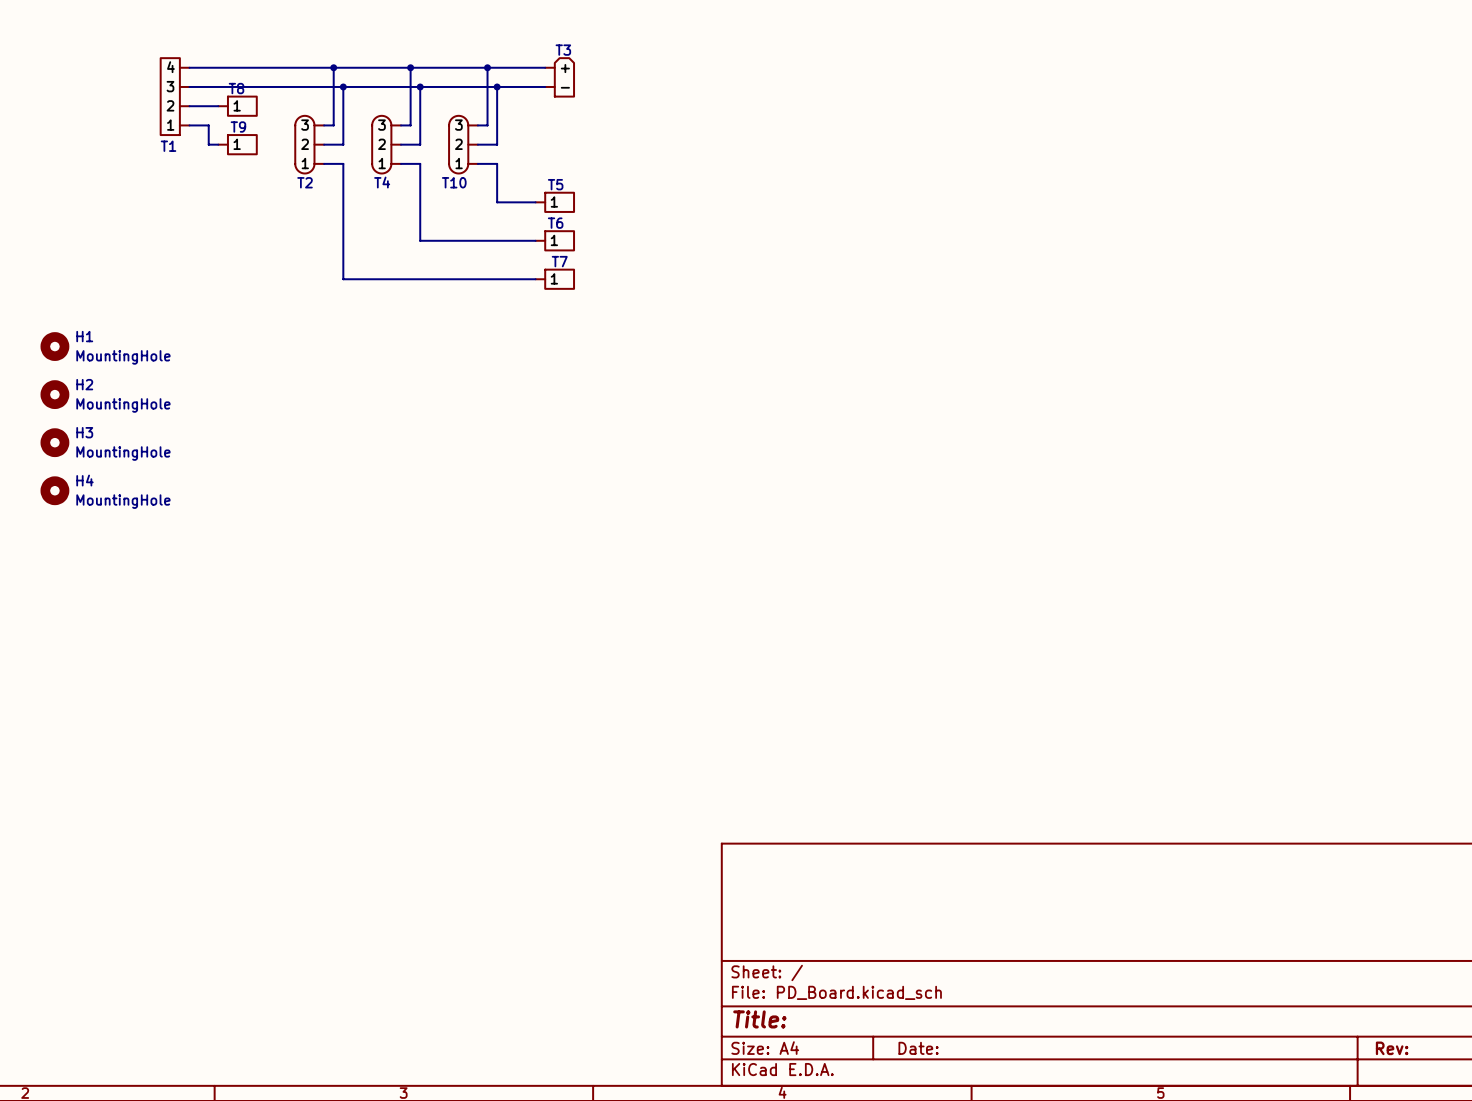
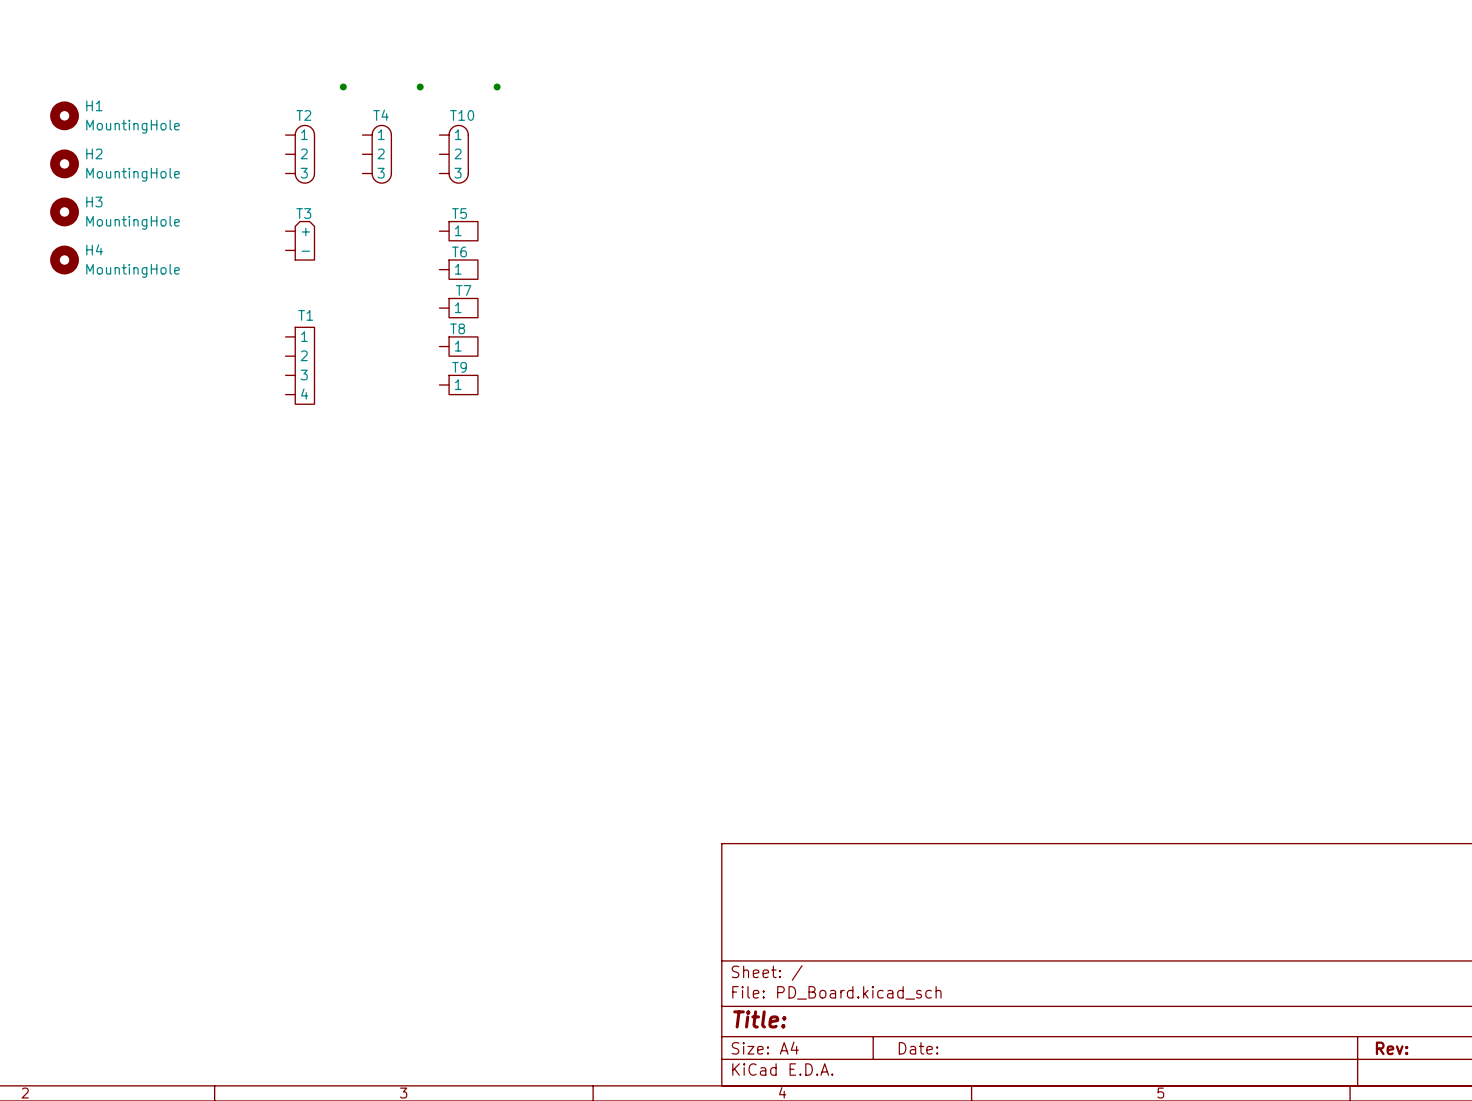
wire: (189, 67) (545, 67) -> none
wire: (333, 67) (333, 125) (324, 125) -> none
junction: (333, 67) -> none
wire: (410, 67) (410, 125) (401, 125) -> none
junction: (410, 67) -> none
wire: (487, 67) (487, 125) (477, 125) -> none
junction: (487, 67) -> none
T3 position: (559, 77) -> (300, 240)
wire: (189, 86) (545, 86) -> none
wire: (343, 86) (343, 144) (324, 144) -> none
wire: (420, 86) (420, 144) (401, 144) -> none
wire: (497, 86) (497, 144) (477, 144) -> none
T1 rotation: 0° (170, 96) -> 180° (304, 365)
T1 position: (175, 96) -> (300, 365)
wire: (189, 106) (218, 106) -> none
T8 position: (237, 106) -> (458, 346)
wire: (189, 125) (208, 125) (208, 144) (218, 144) -> none
T9 position: (237, 144) -> (458, 384)
T2 rotation: 0° (304, 144) -> 180° (304, 154)
T4 rotation: 0° (381, 144) -> 180° (381, 154)
T10 rotation: 0° (458, 144) -> 180° (458, 154)
wire: (324, 163) (343, 163) (343, 279) (535, 279) -> none
wire: (401, 163) (420, 163) (420, 240) (535, 240) -> none
wire: (477, 163) (497, 163) (497, 202) (535, 202) -> none
T5 position: (554, 202) -> (458, 231)
T6 position: (554, 240) -> (458, 269)
T7 position: (554, 279) -> (458, 308)
H1 position: (54, 346) -> (64, 115)
H2 position: (54, 394) -> (64, 163)
H3 position: (54, 442) -> (64, 211)
H4 position: (54, 490) -> (64, 260)

